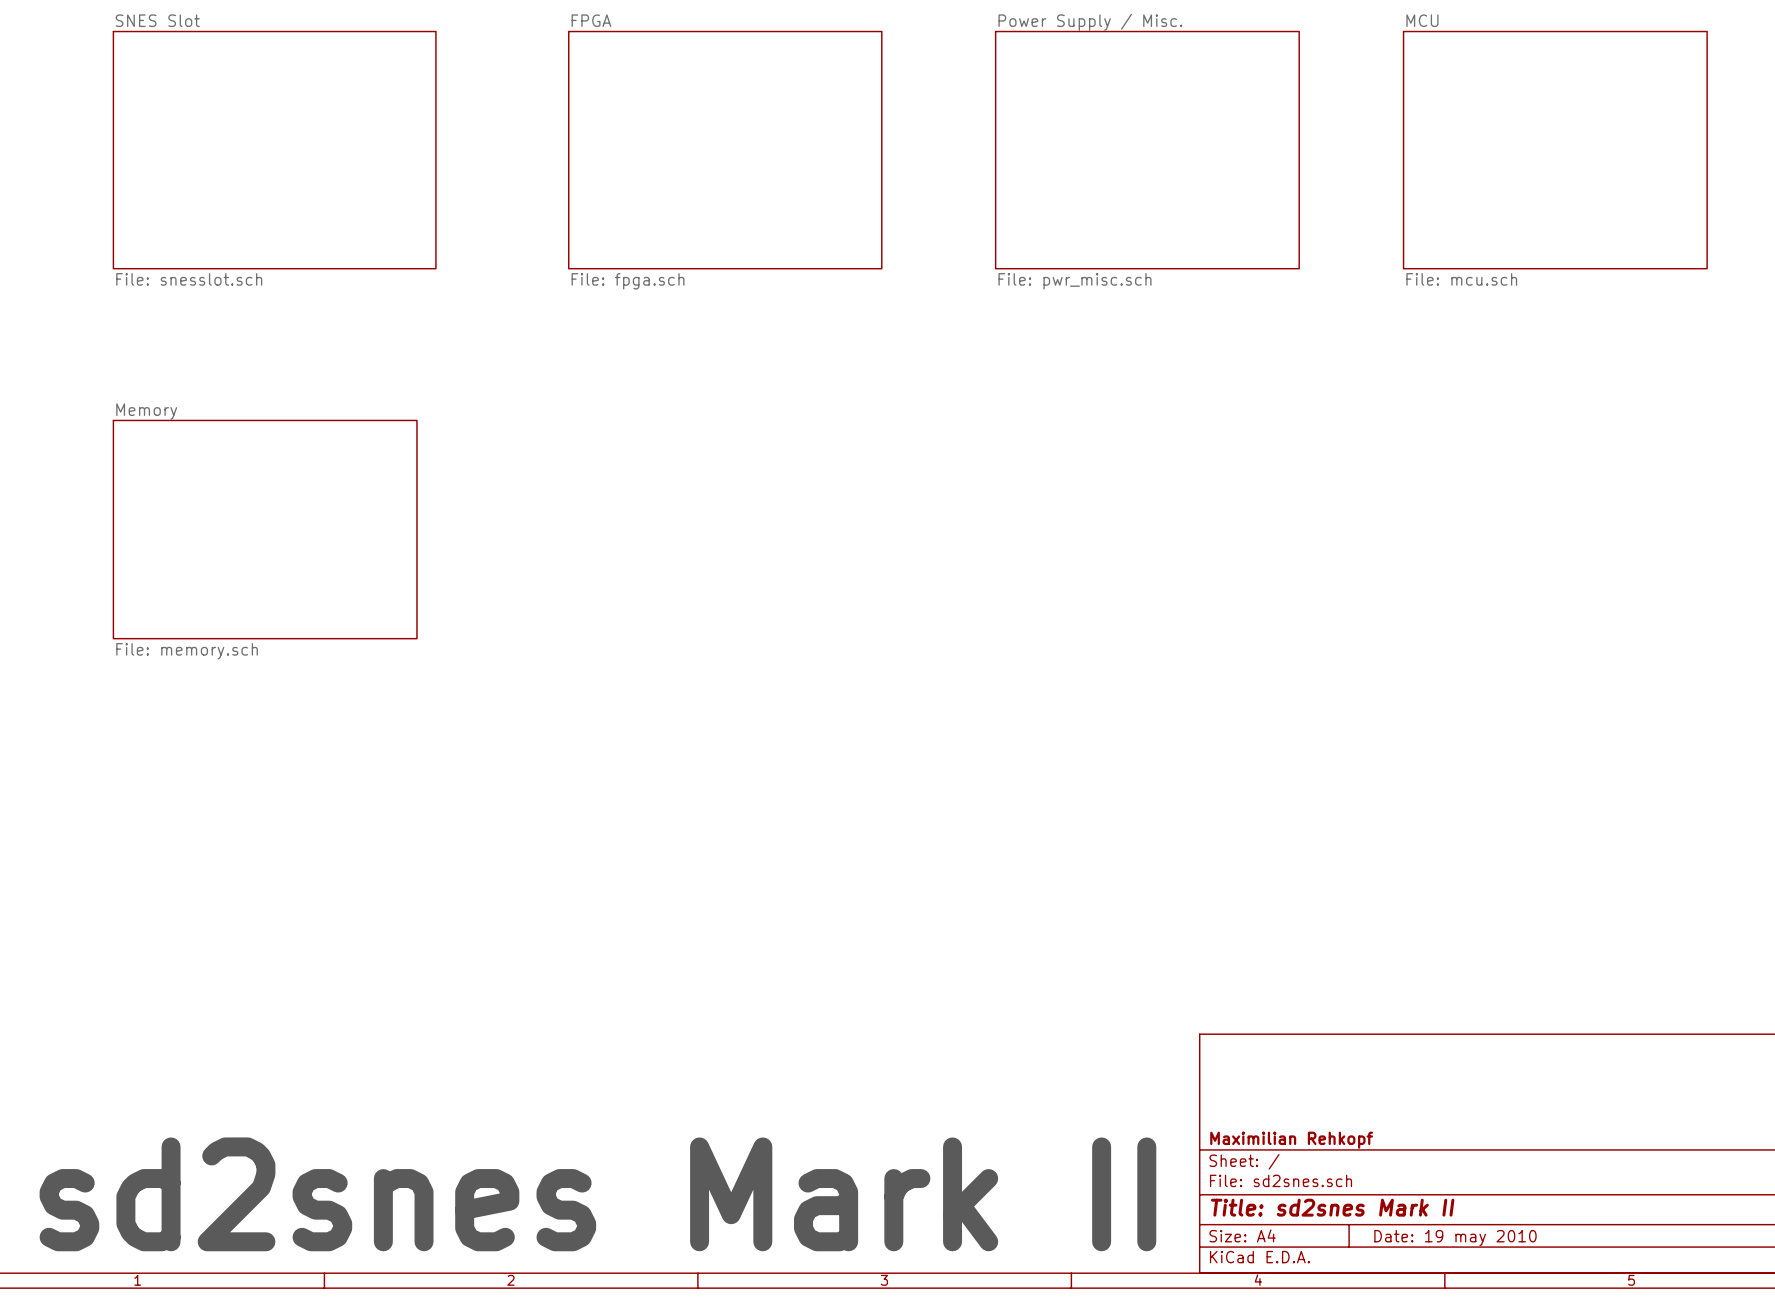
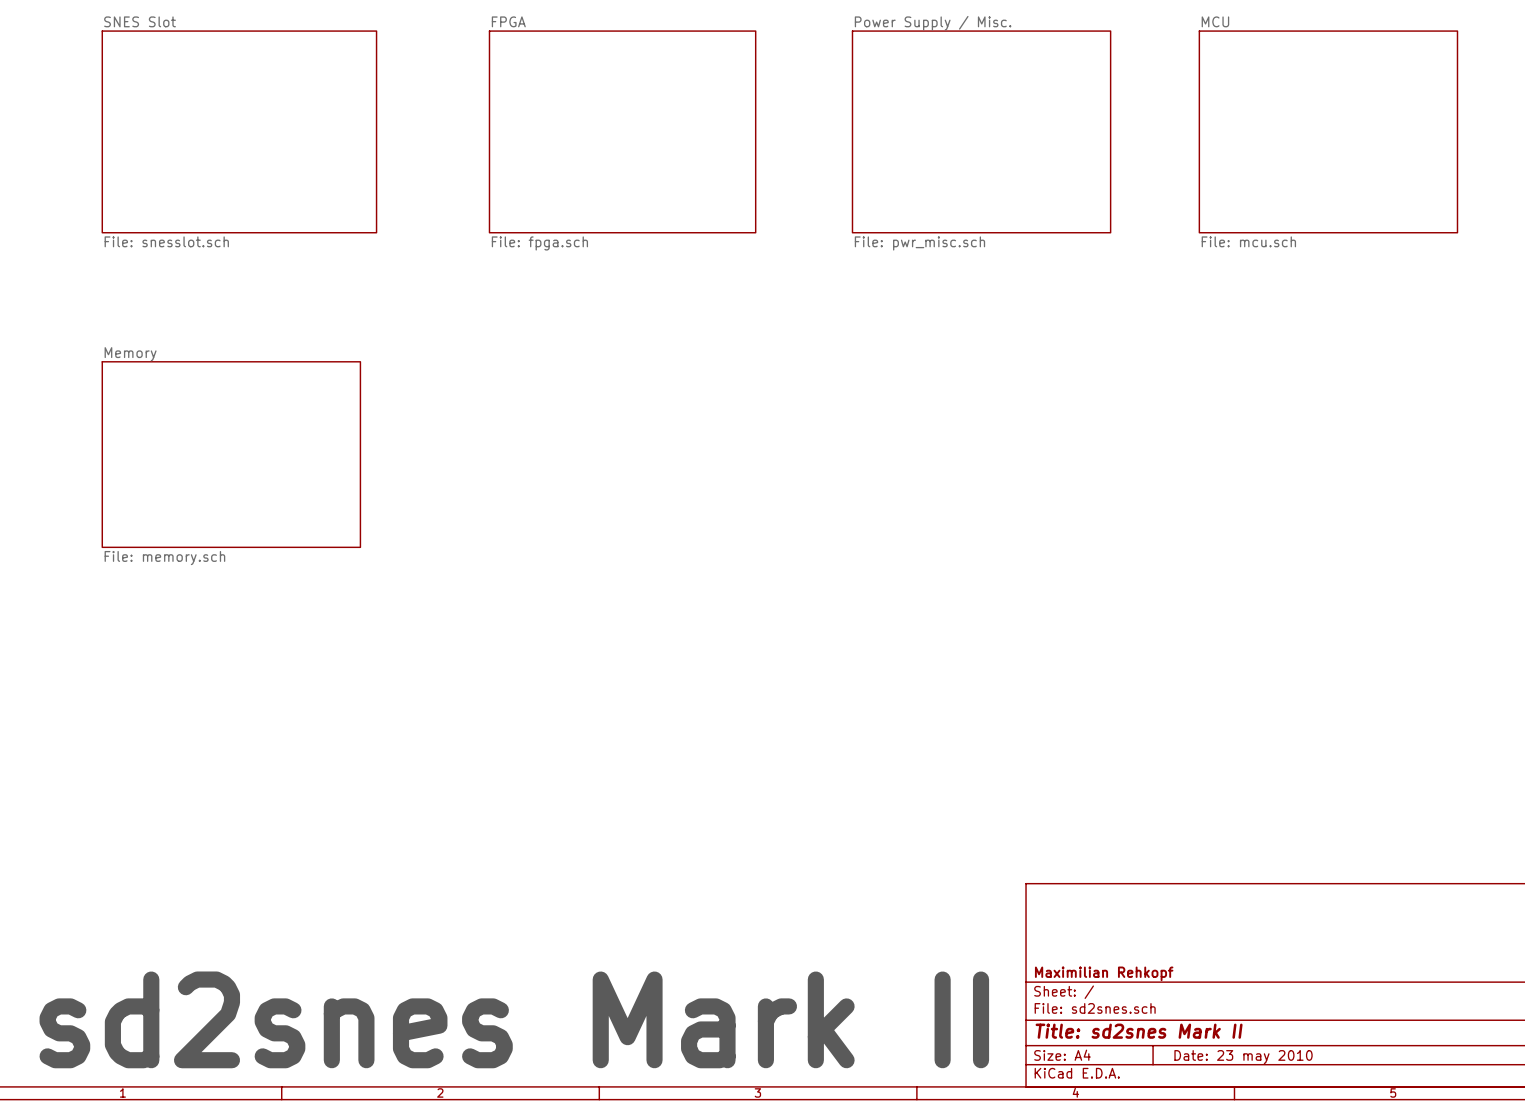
title block: Date: 19 may 2010 (1455, 1238) -> Date: 23 may 2010 (1243, 1057)

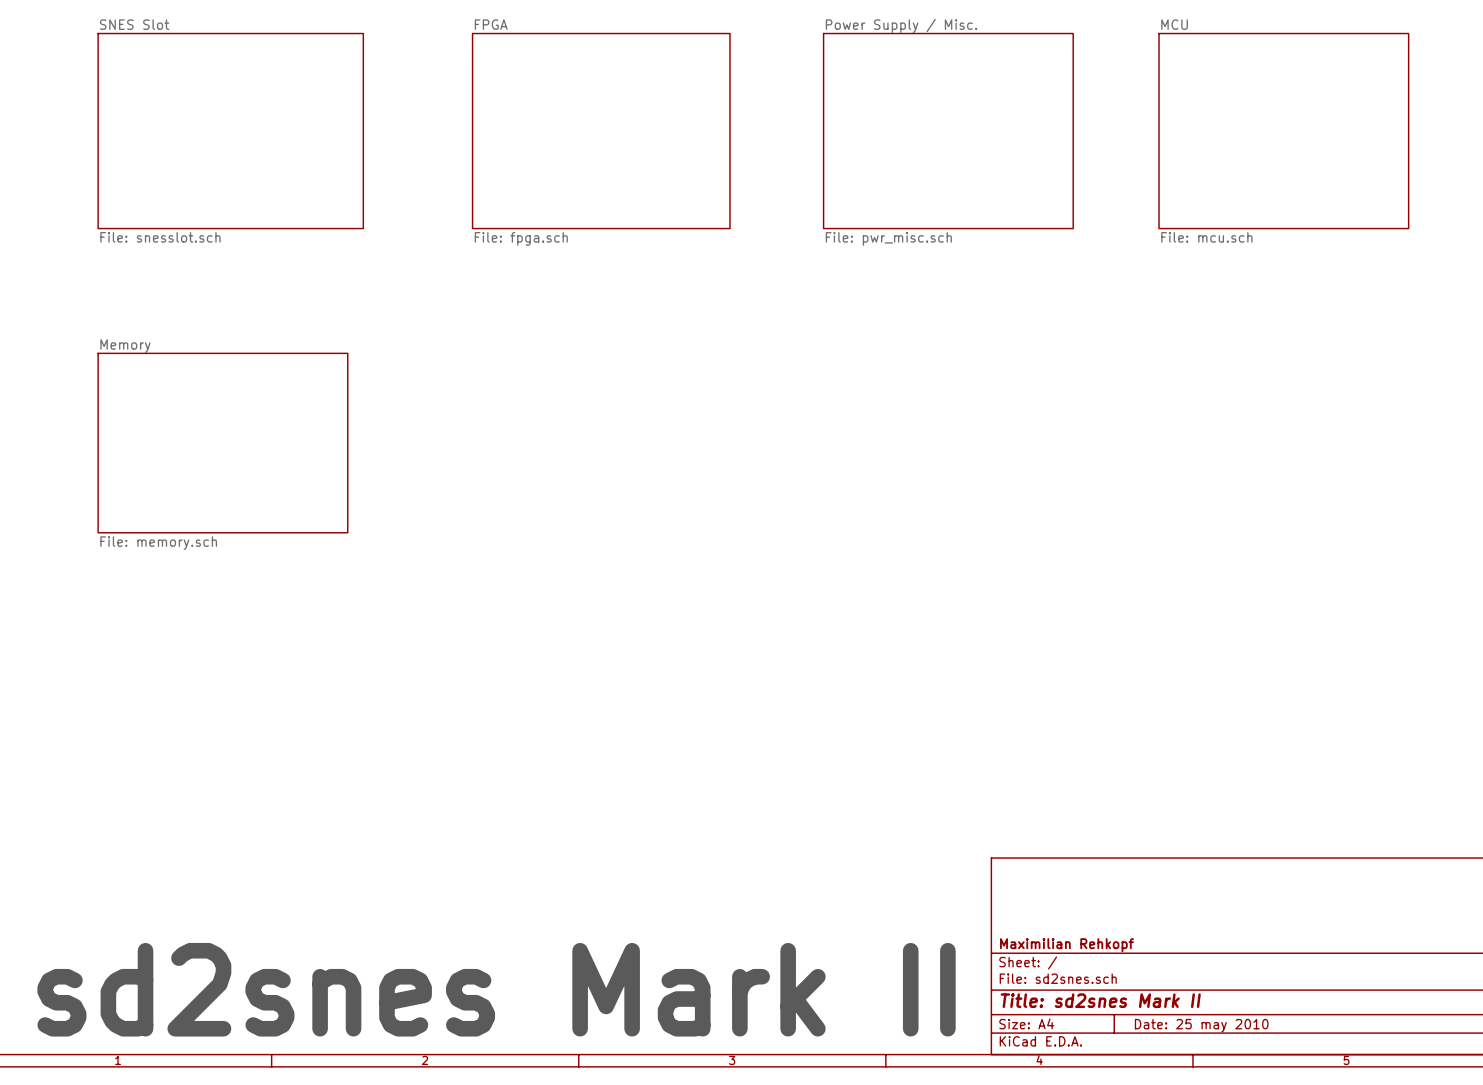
title block: Date: 23 may 2010 (1243, 1057) -> Date: 25 may 2010 (1201, 1025)

